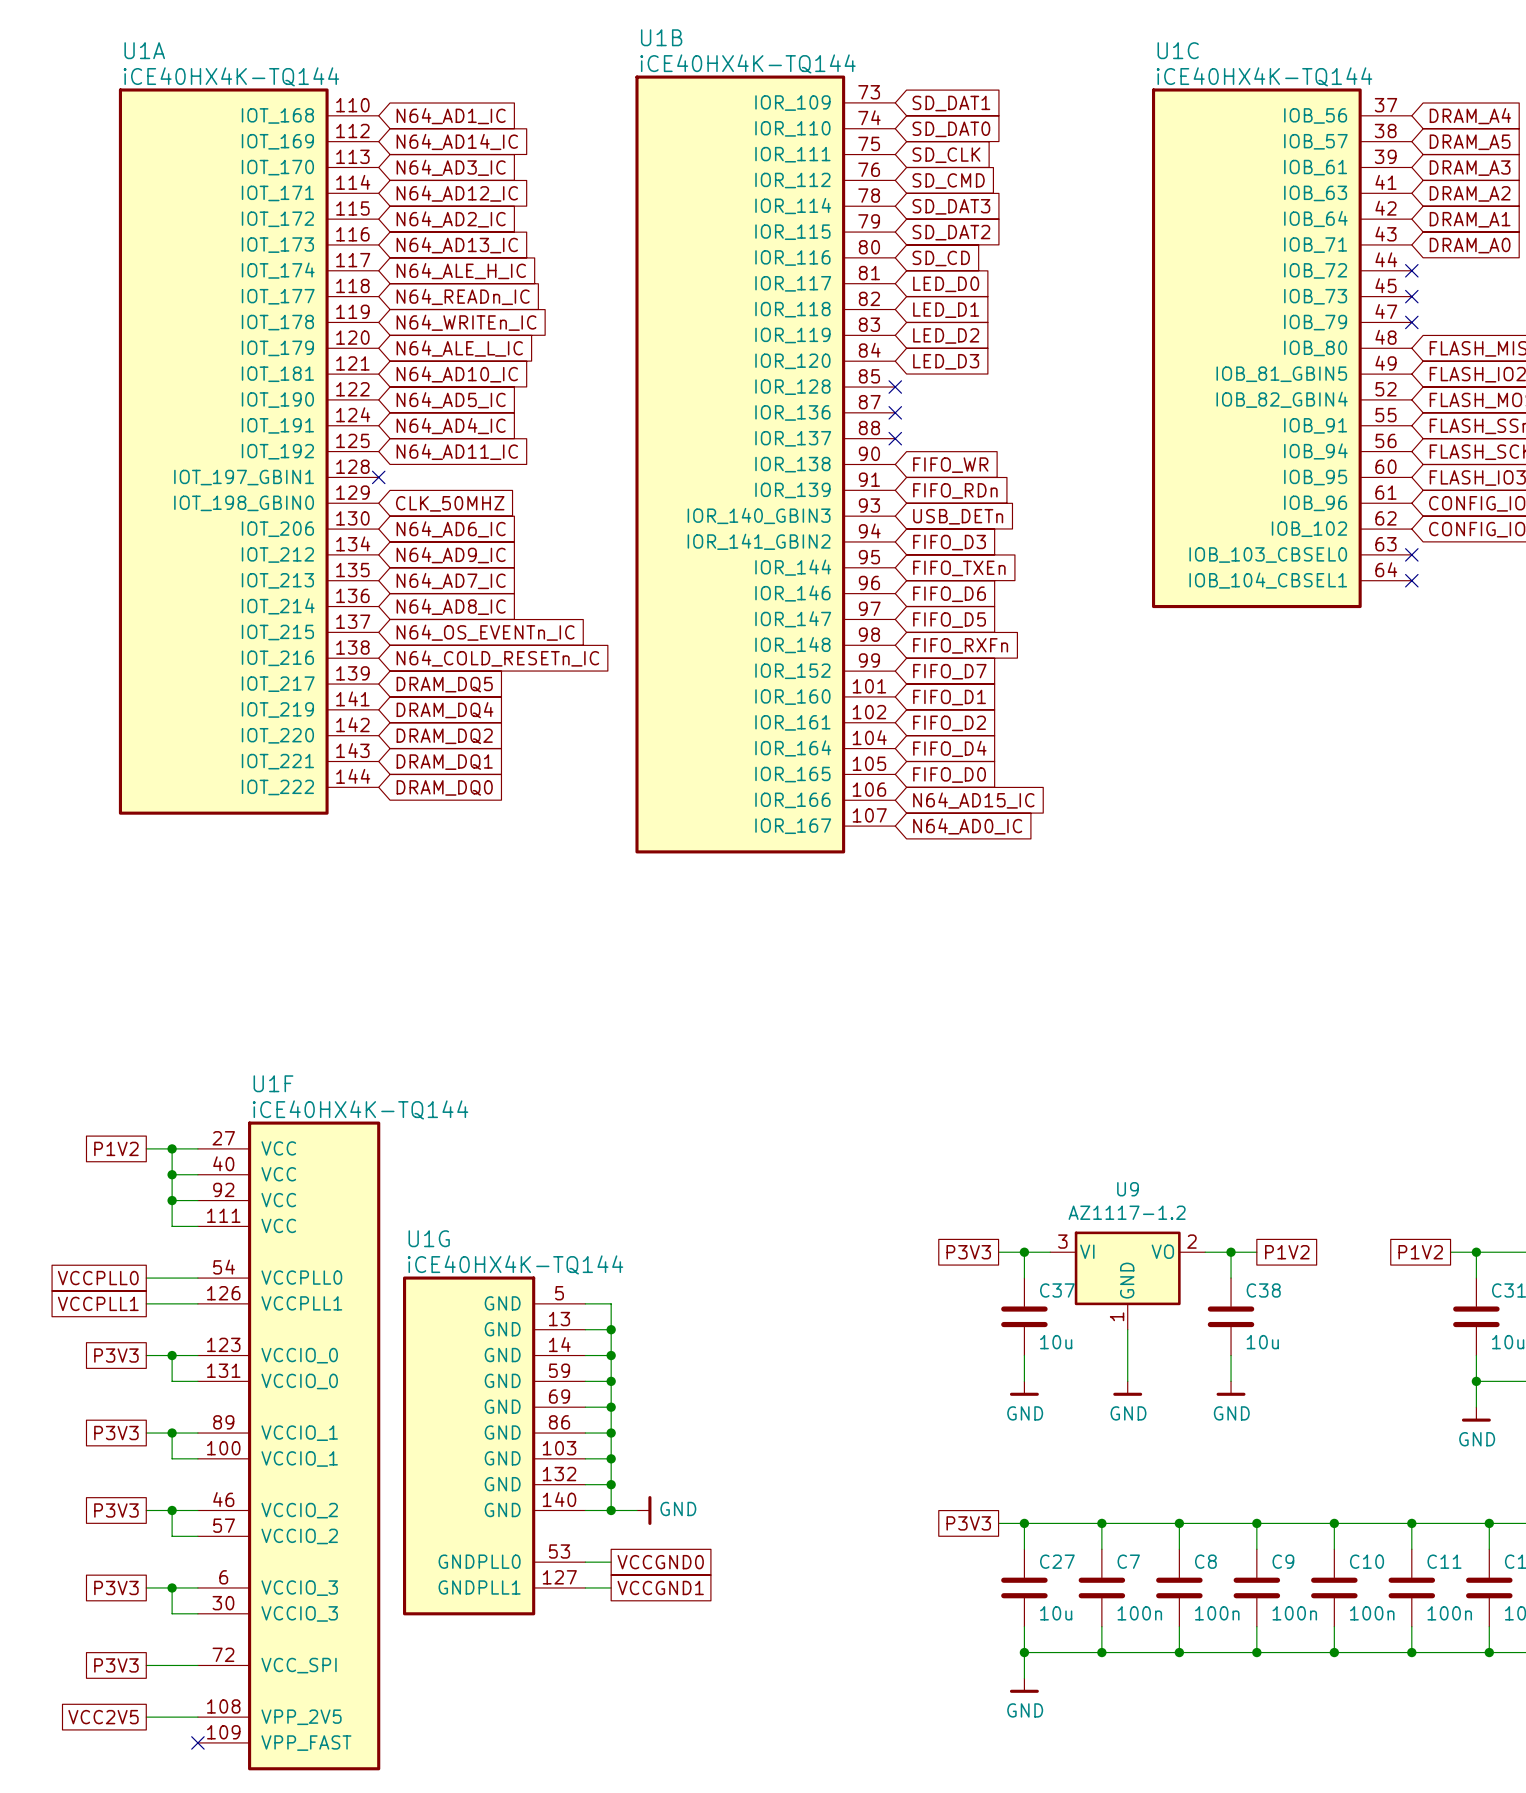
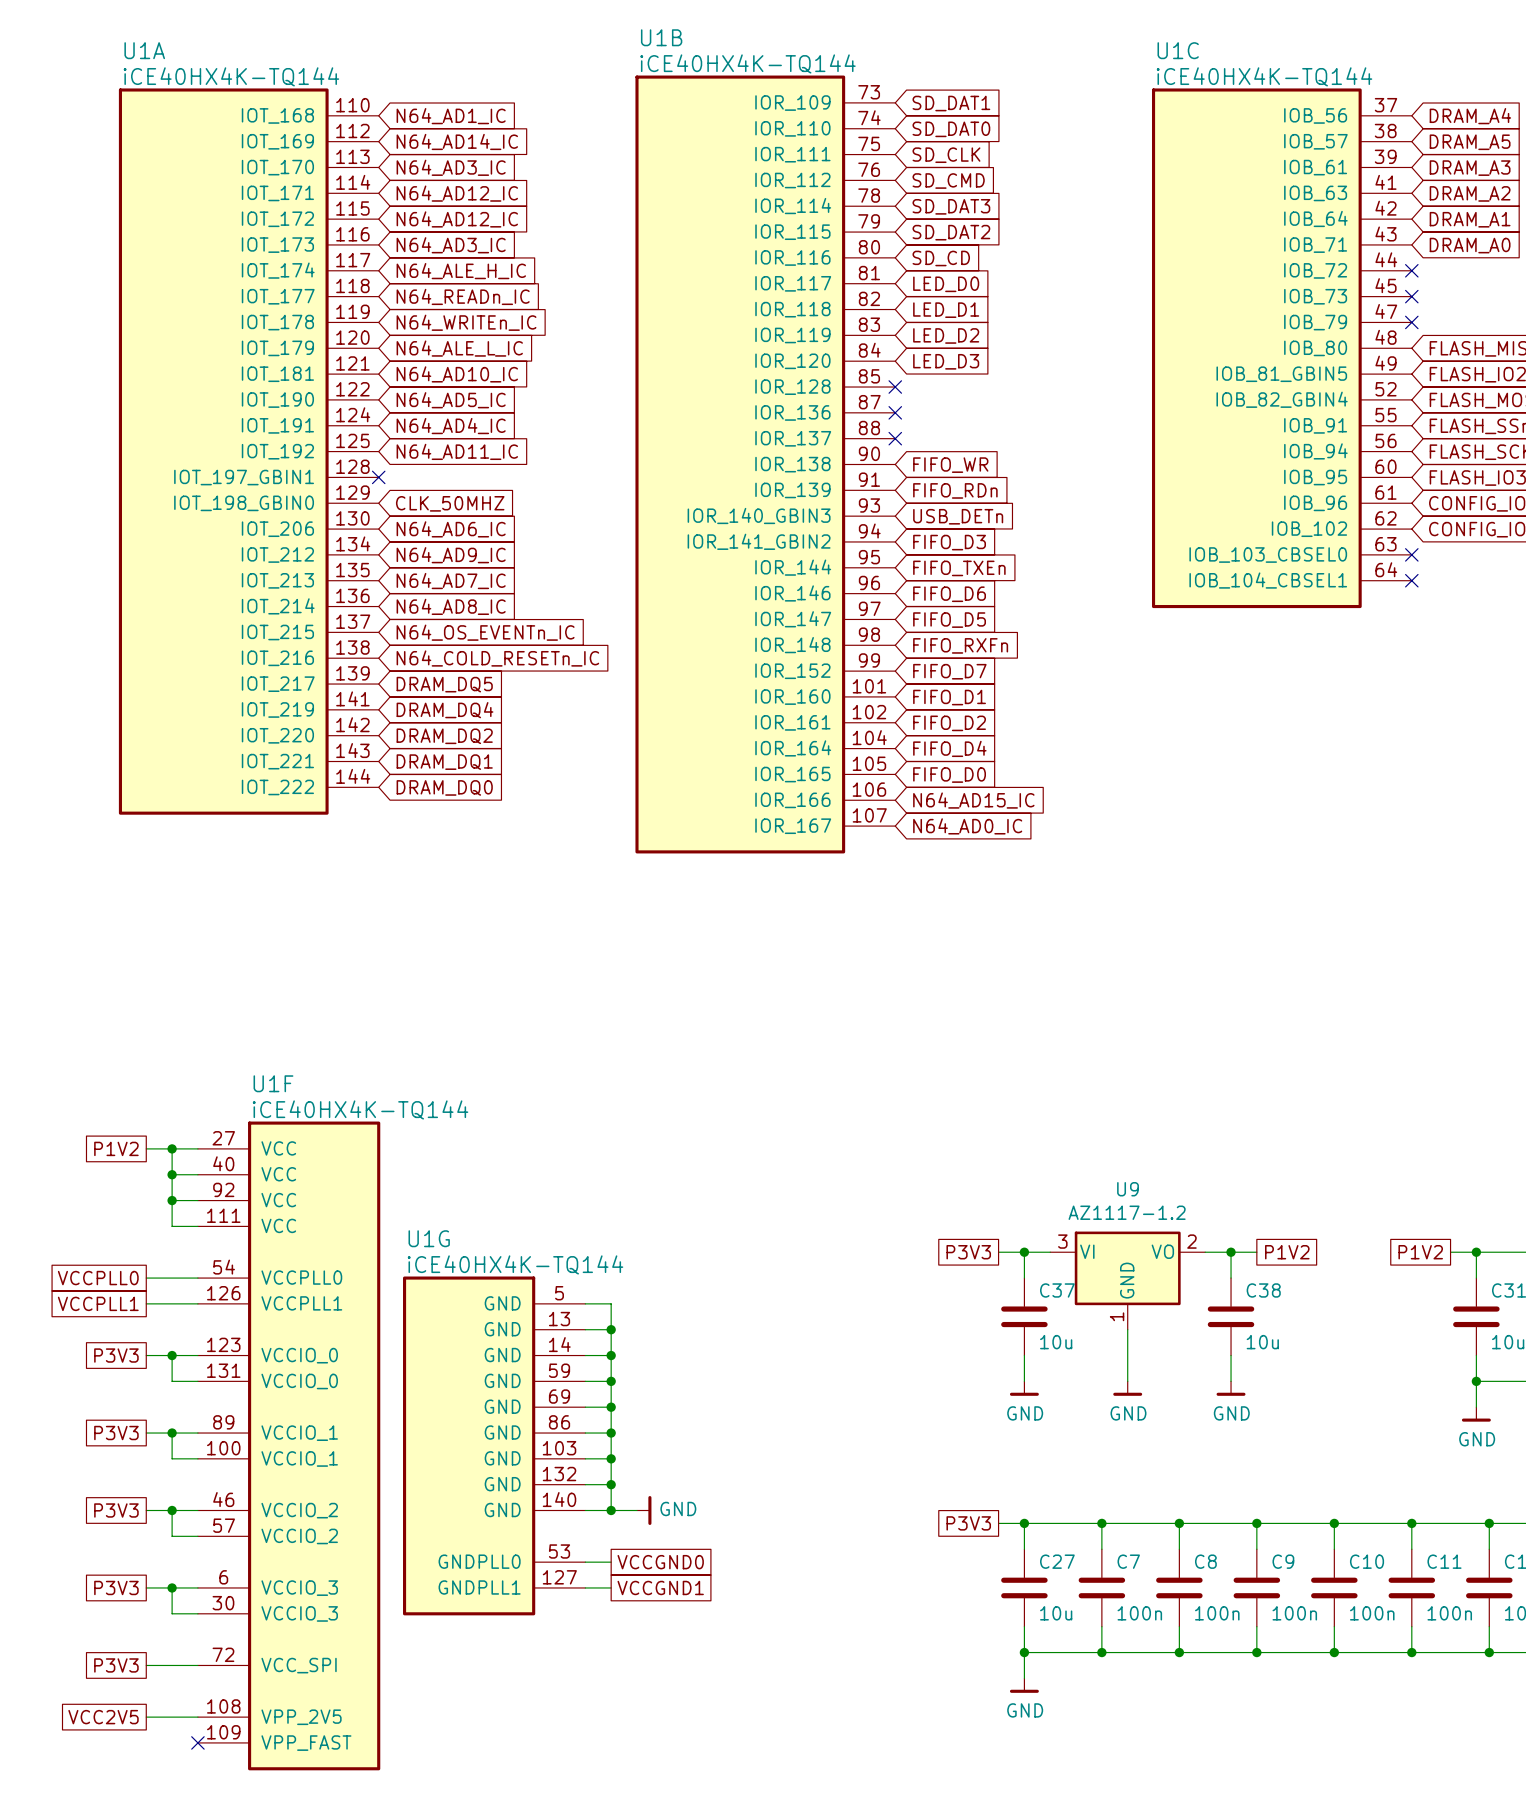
global label: N64_AD2_IC (451, 219) -> N64_AD12_IC (457, 219)
global label: N64_AD13_IC (457, 245) -> N64_AD3_IC (451, 245)

